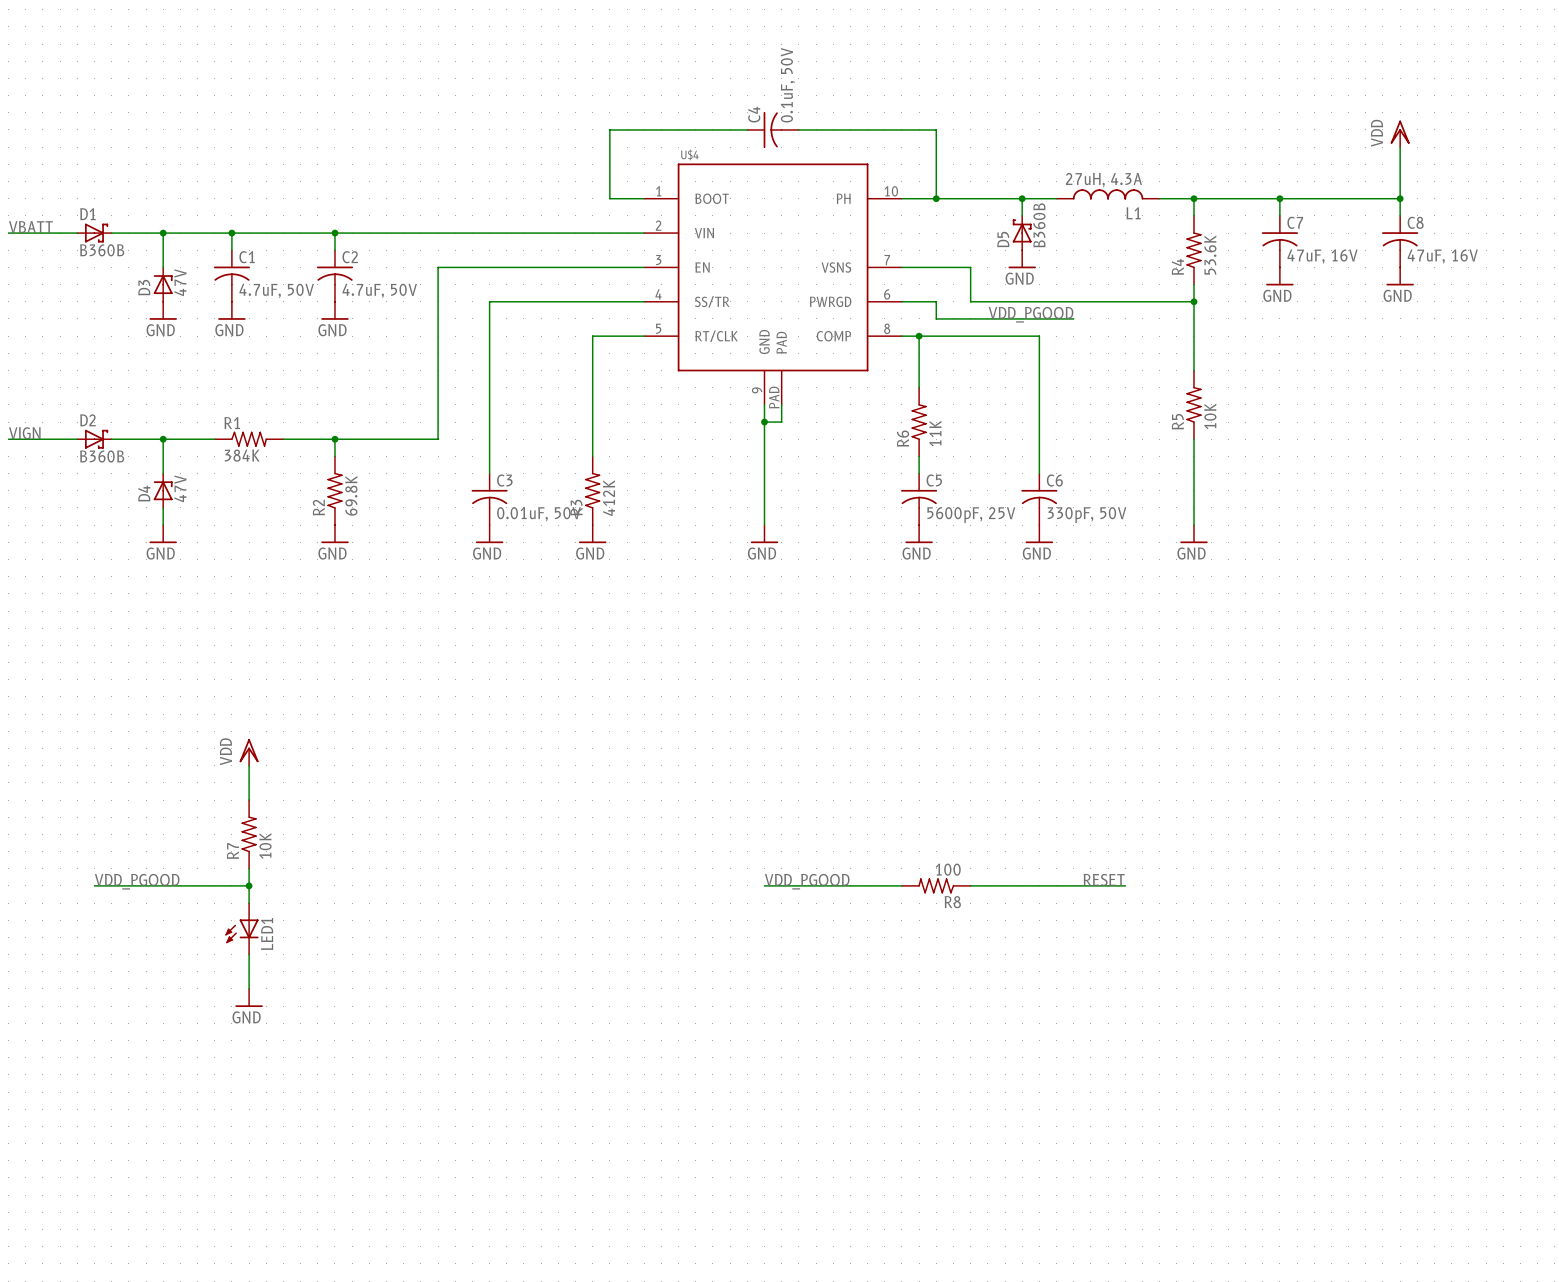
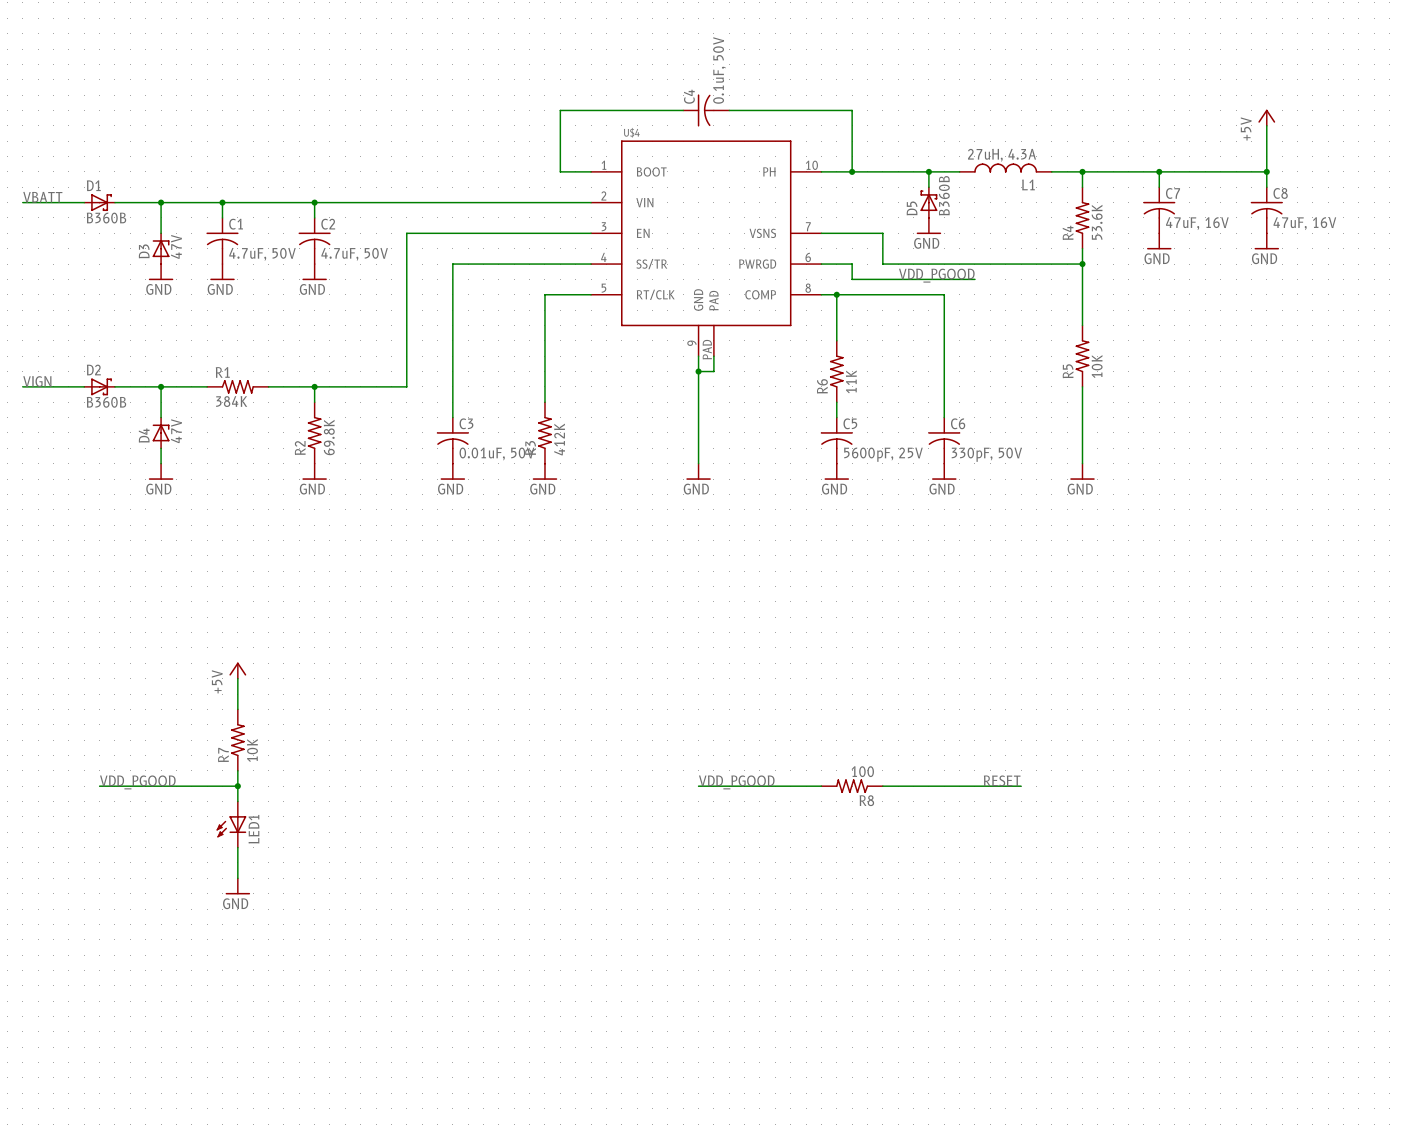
power symbol: VDD (1400, 133) -> +5V (1266, 117)
power symbol: VDD (249, 752) -> +5V (237, 670)

